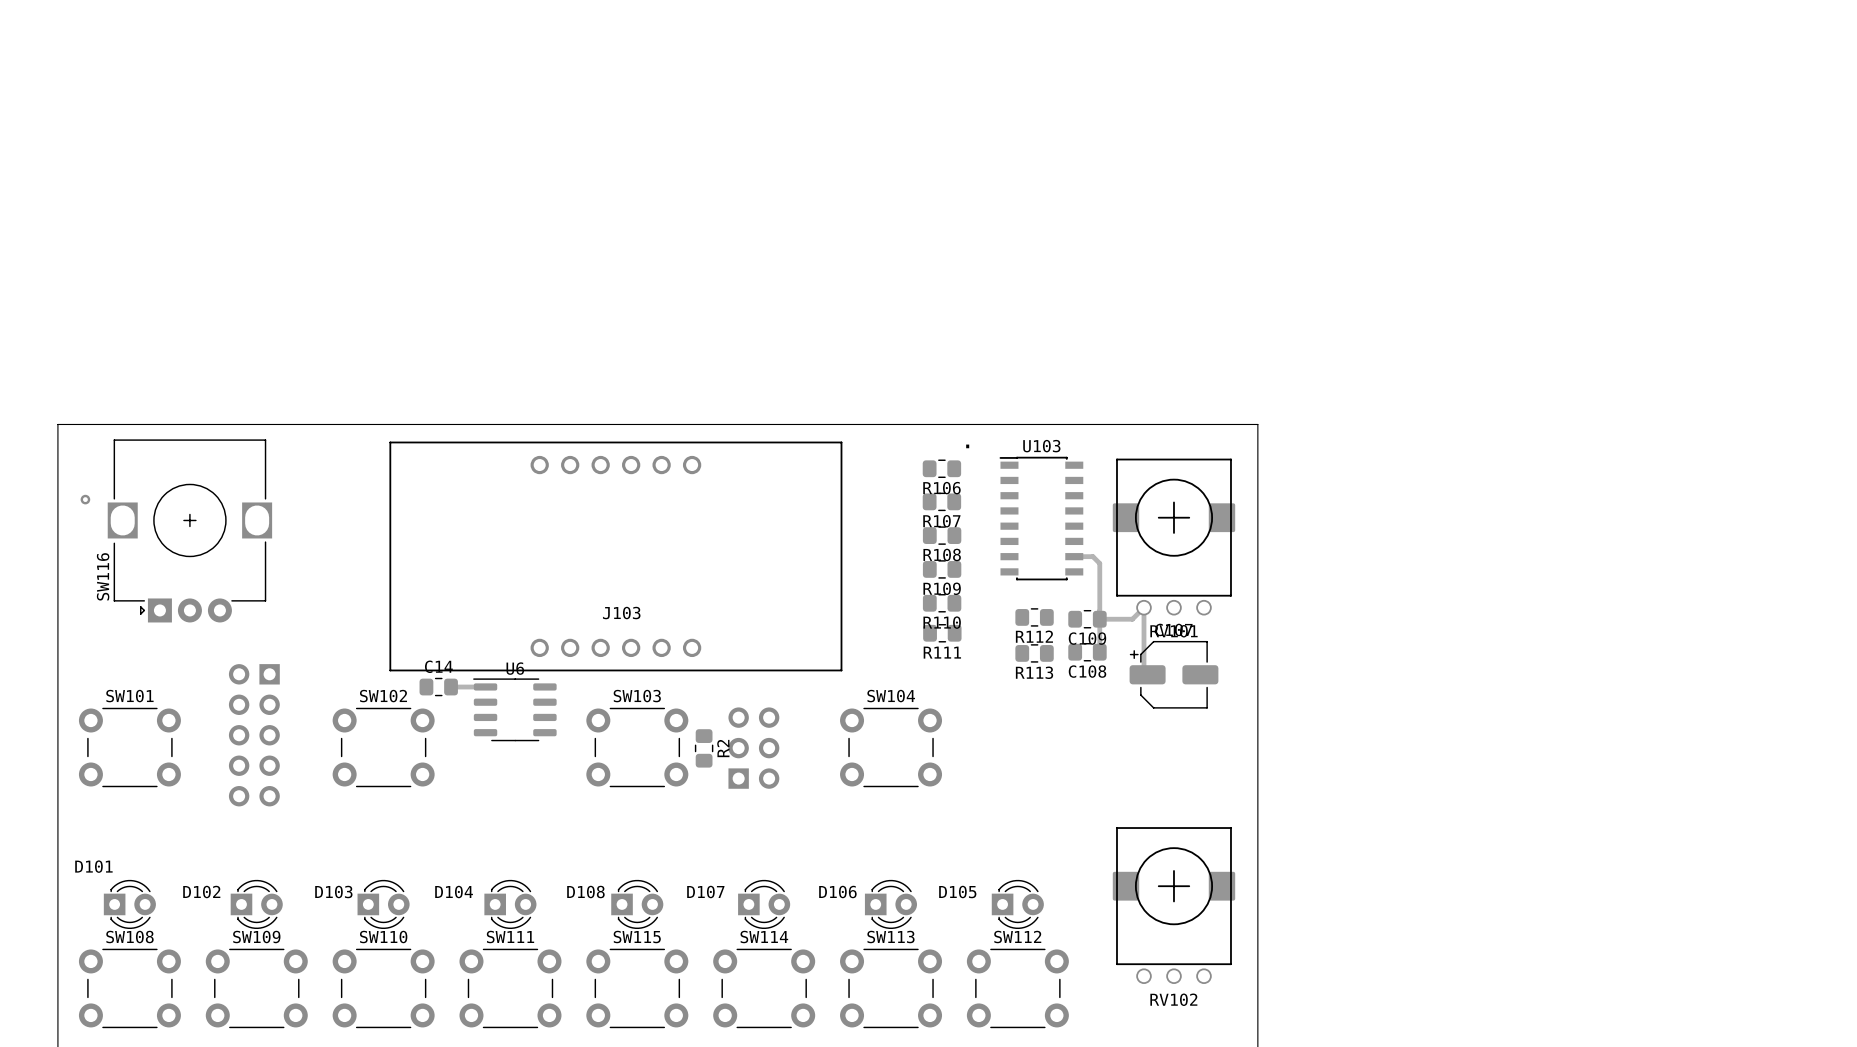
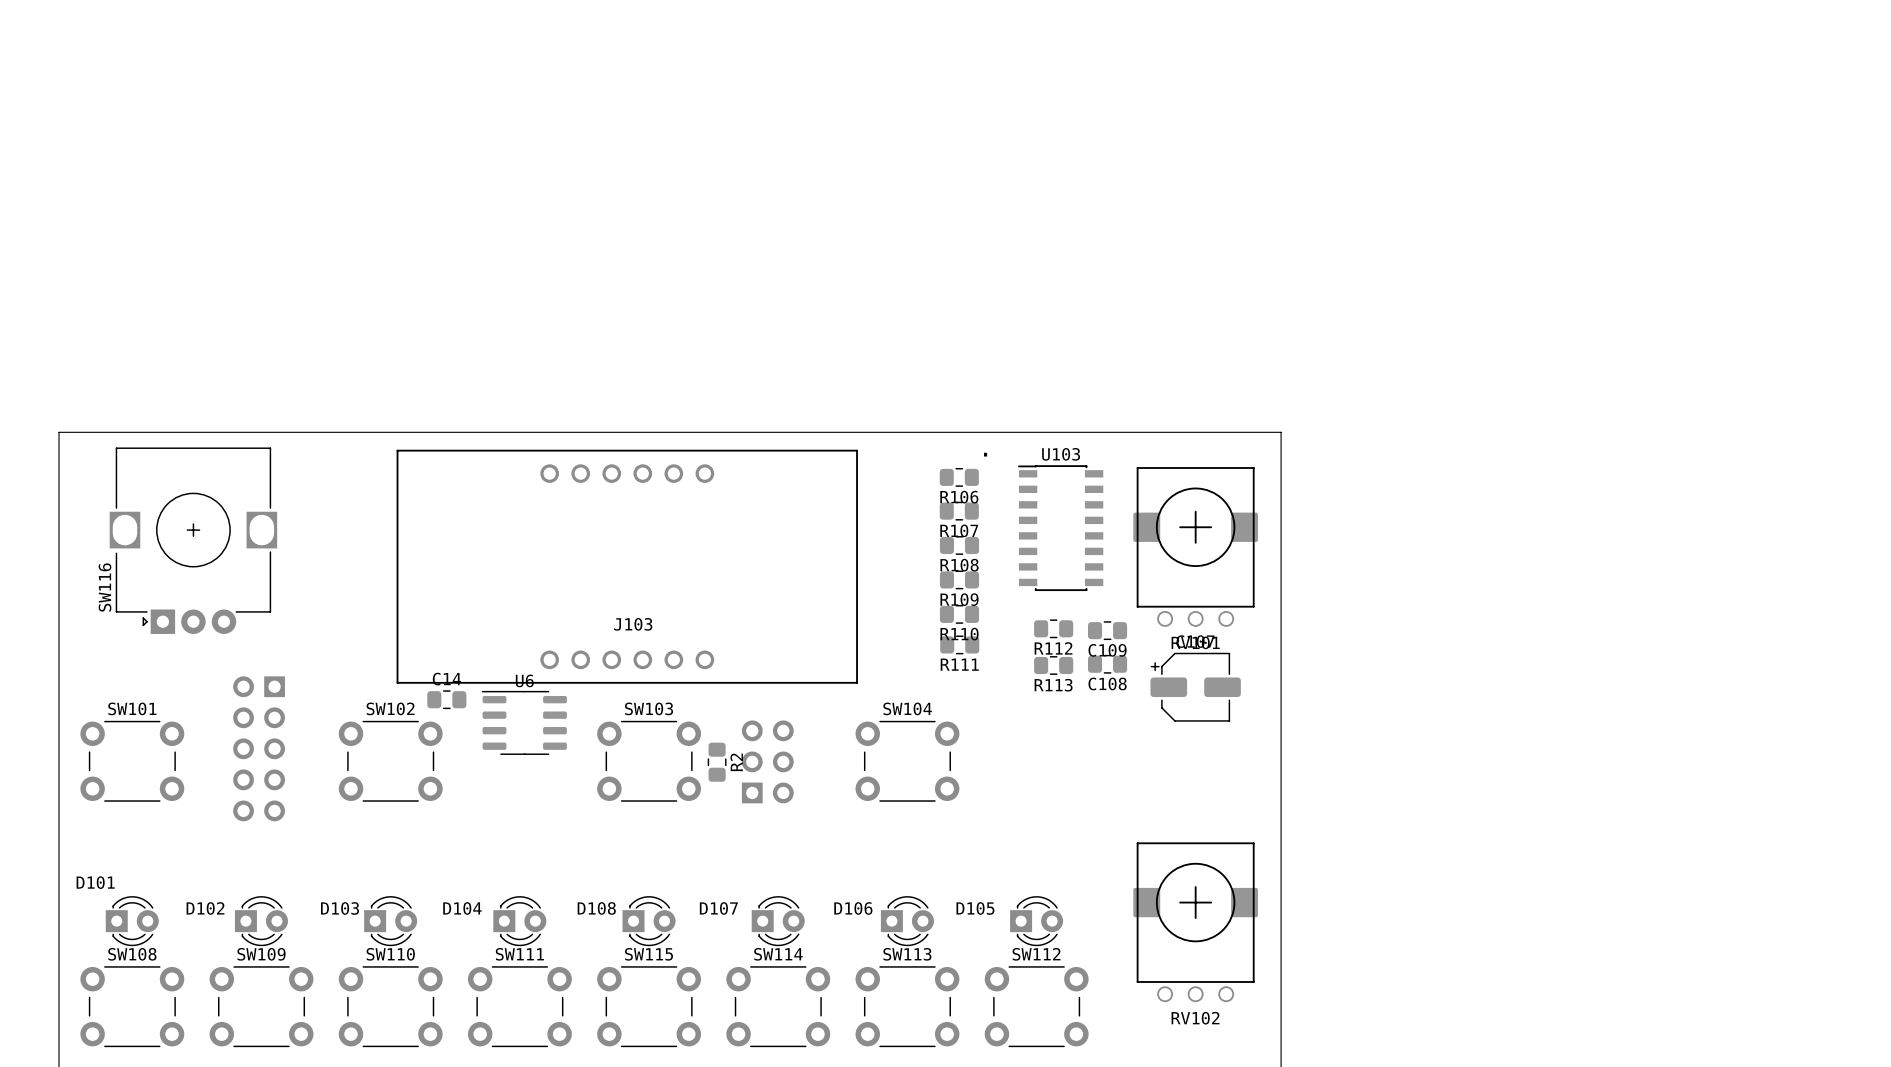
via: (85, 499) -> none
track: (1074, 556) (1092, 556) (1099, 563) (1099, 652) -> none
track: (1099, 619) (1132, 619) (1143, 607) (1143, 671) (1147, 674) -> none
track: (451, 687) (485, 687) -> none

